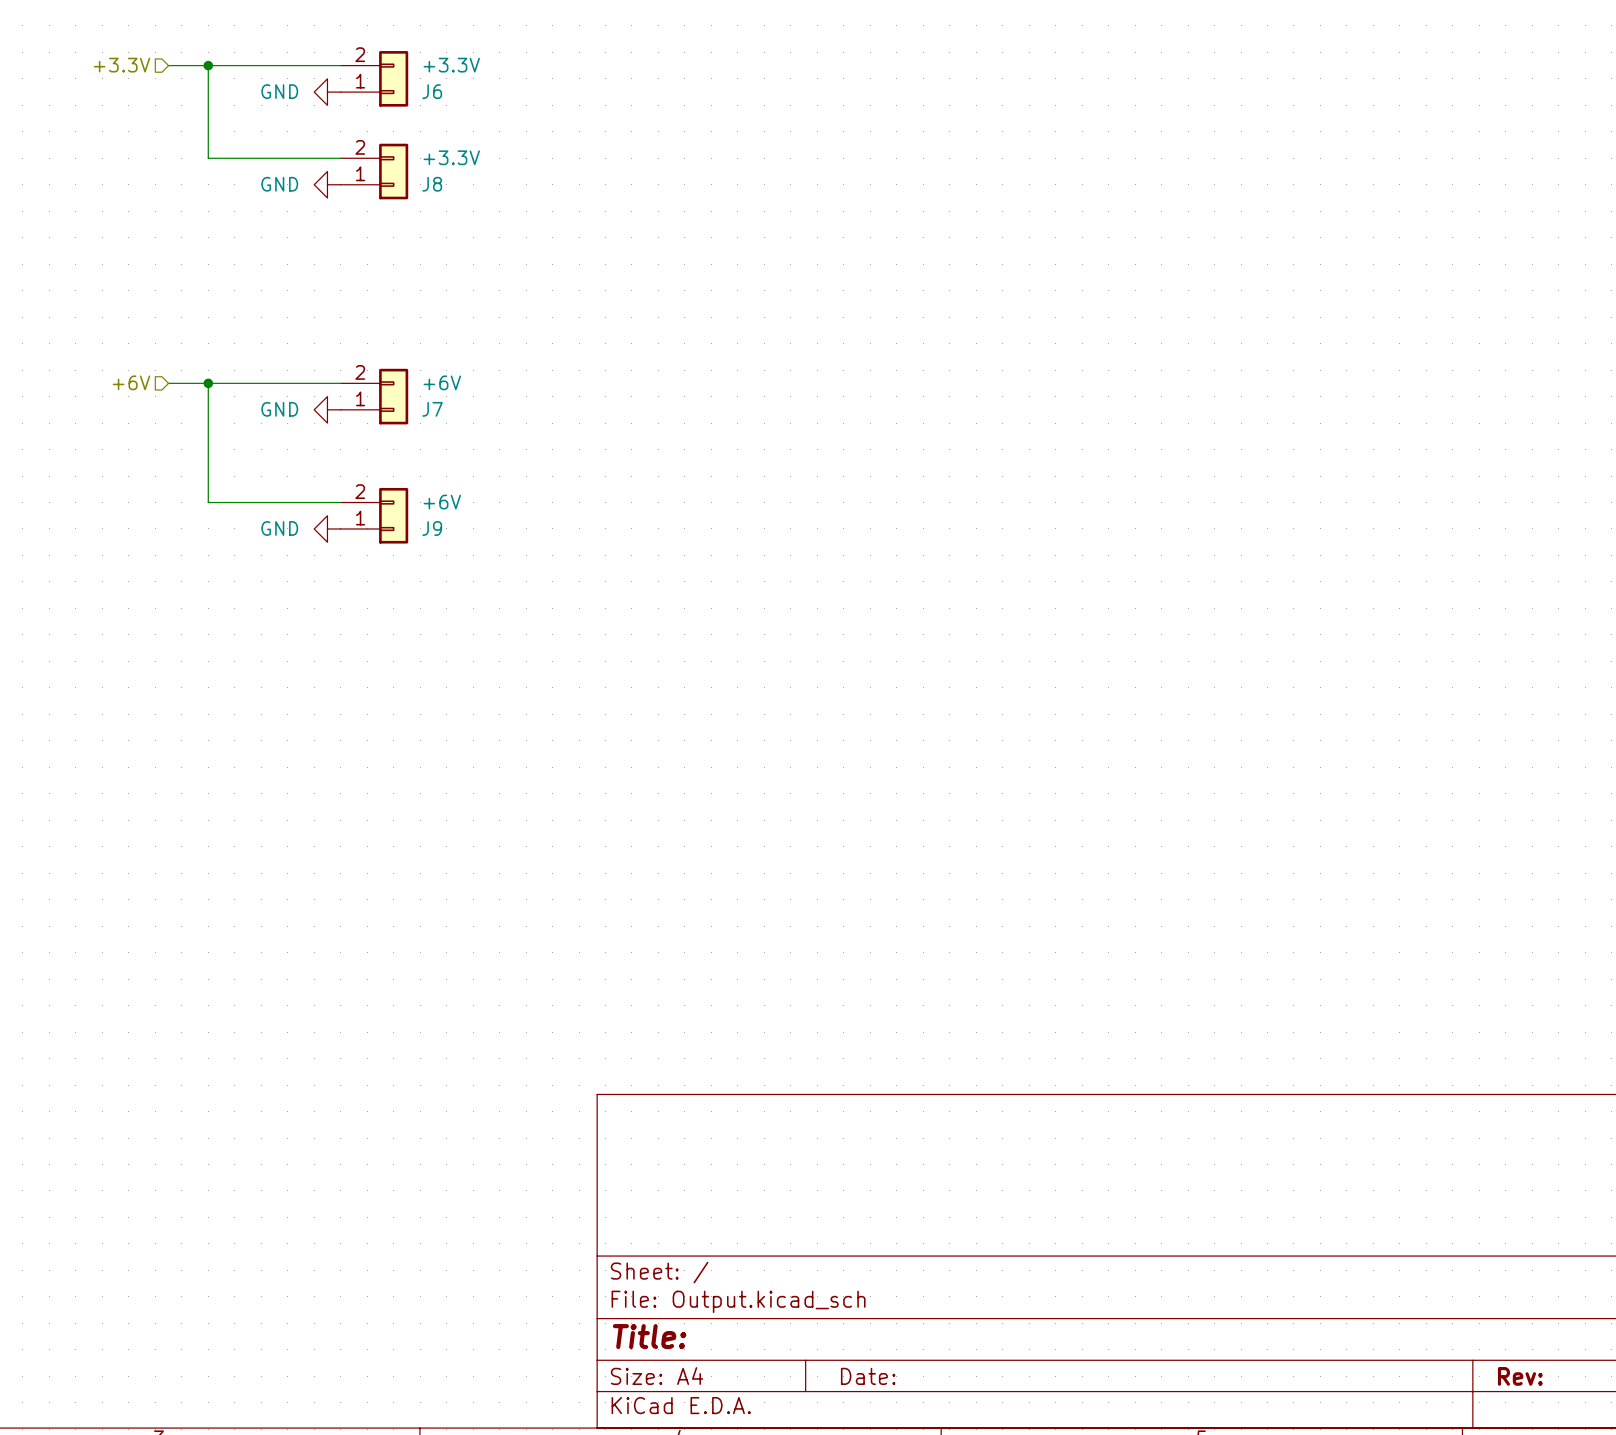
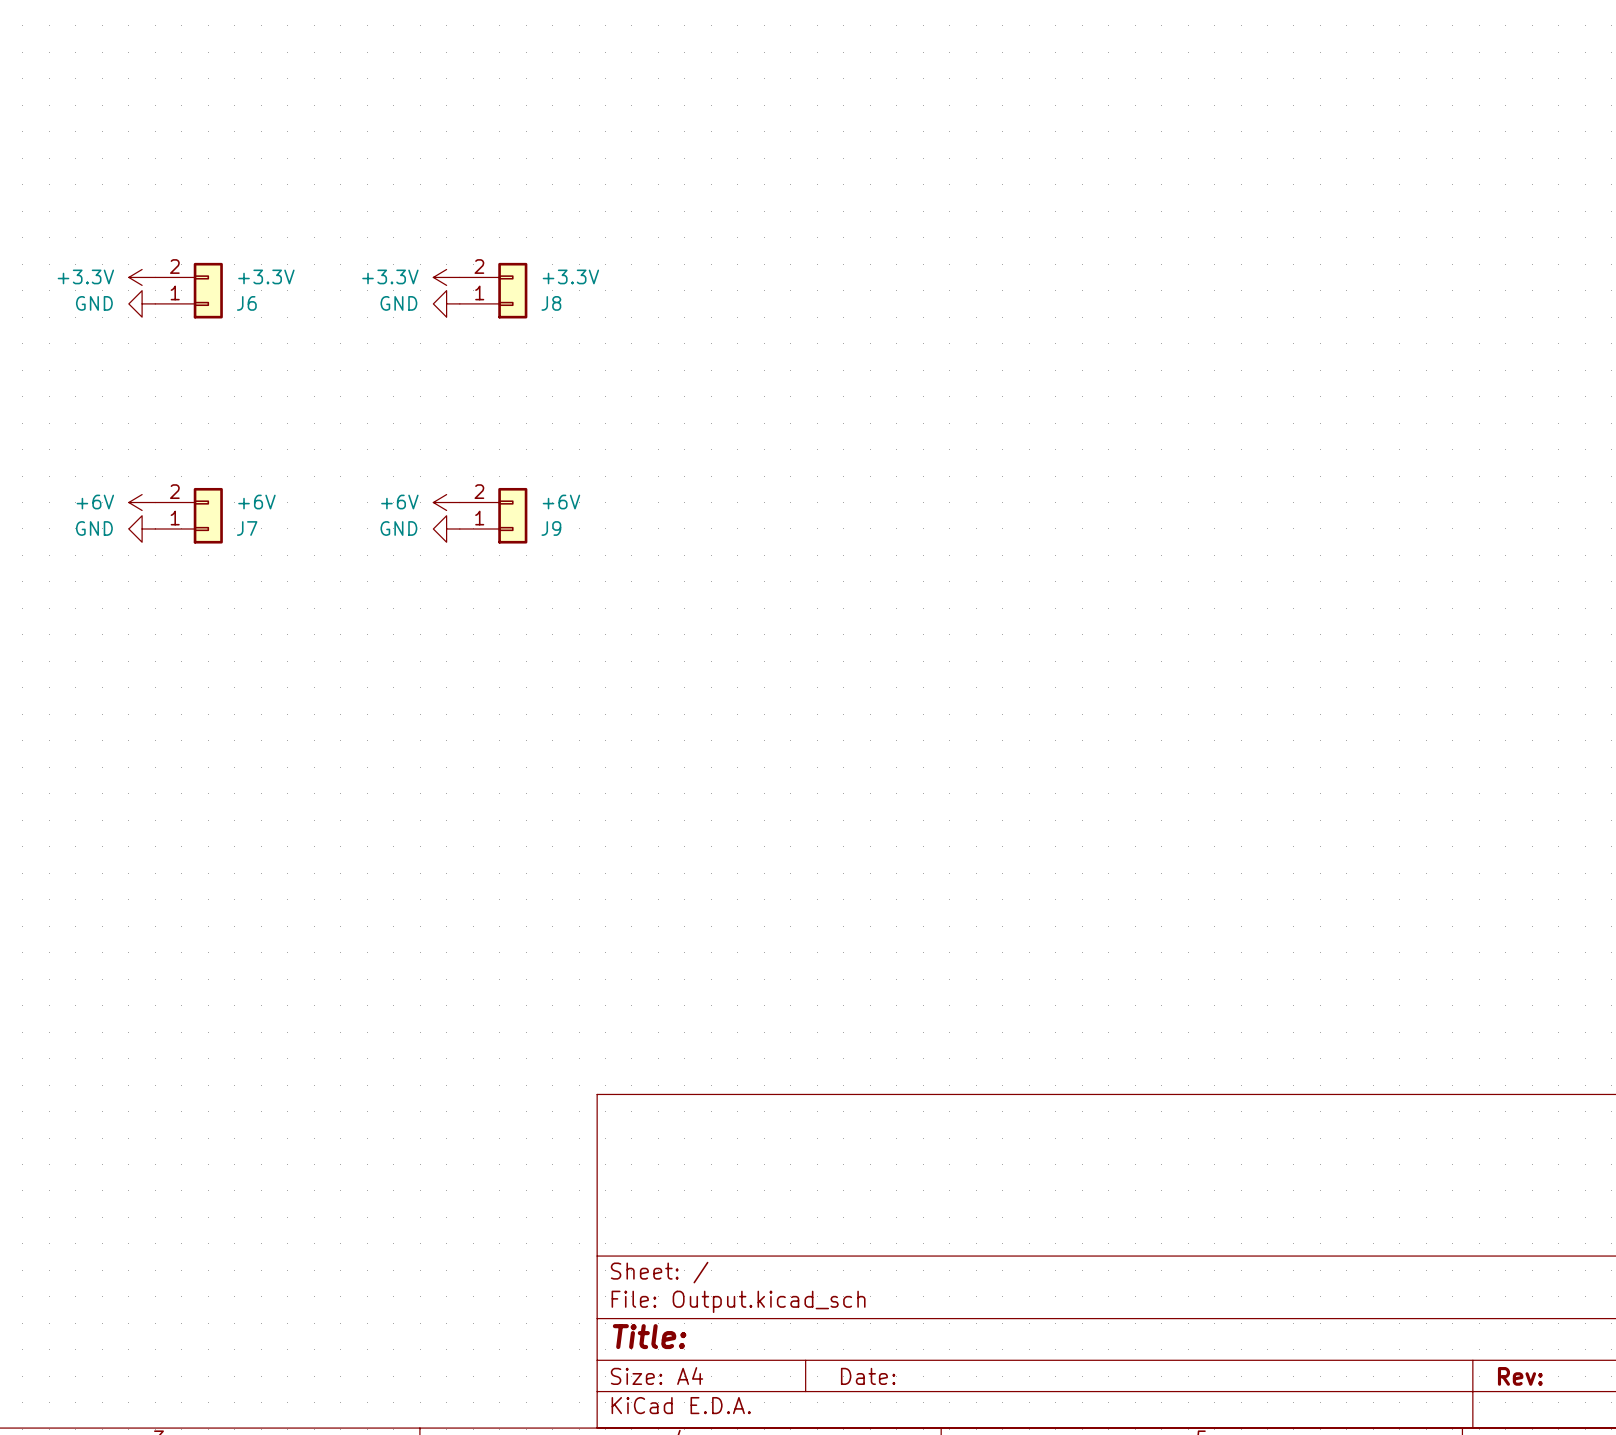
hierarchical label: +3.3V (122, 65) -> none
wire: (168, 65) (340, 65) -> none
wire: (208, 65) (208, 158) (340, 158) -> none
junction: (208, 65) -> none
J6 position: (374, 78) -> (189, 290)
power symbol: GND (327, 92) -> none
J8 position: (374, 171) -> (493, 290)
power symbol: GND (327, 184) -> none
power symbol: none -> +3.3V (142, 277)
power symbol: none -> +3.3V (446, 277)
power symbol: none -> GND (142, 303)
power symbol: none -> GND (446, 303)
hierarchical label: +6V (131, 382) -> none
wire: (168, 383) (340, 383) -> none
wire: (208, 383) (208, 502) (340, 502) -> none
junction: (208, 383) -> none
J7 position: (374, 396) -> (189, 515)
power symbol: GND (327, 409) -> none
power symbol: none -> +6V (142, 502)
power symbol: none -> +6V (446, 502)
J9 position: (374, 515) -> (493, 515)
power symbol: none -> GND (142, 528)
power symbol: GND (327, 528) -> none
power symbol: none -> GND (446, 528)

